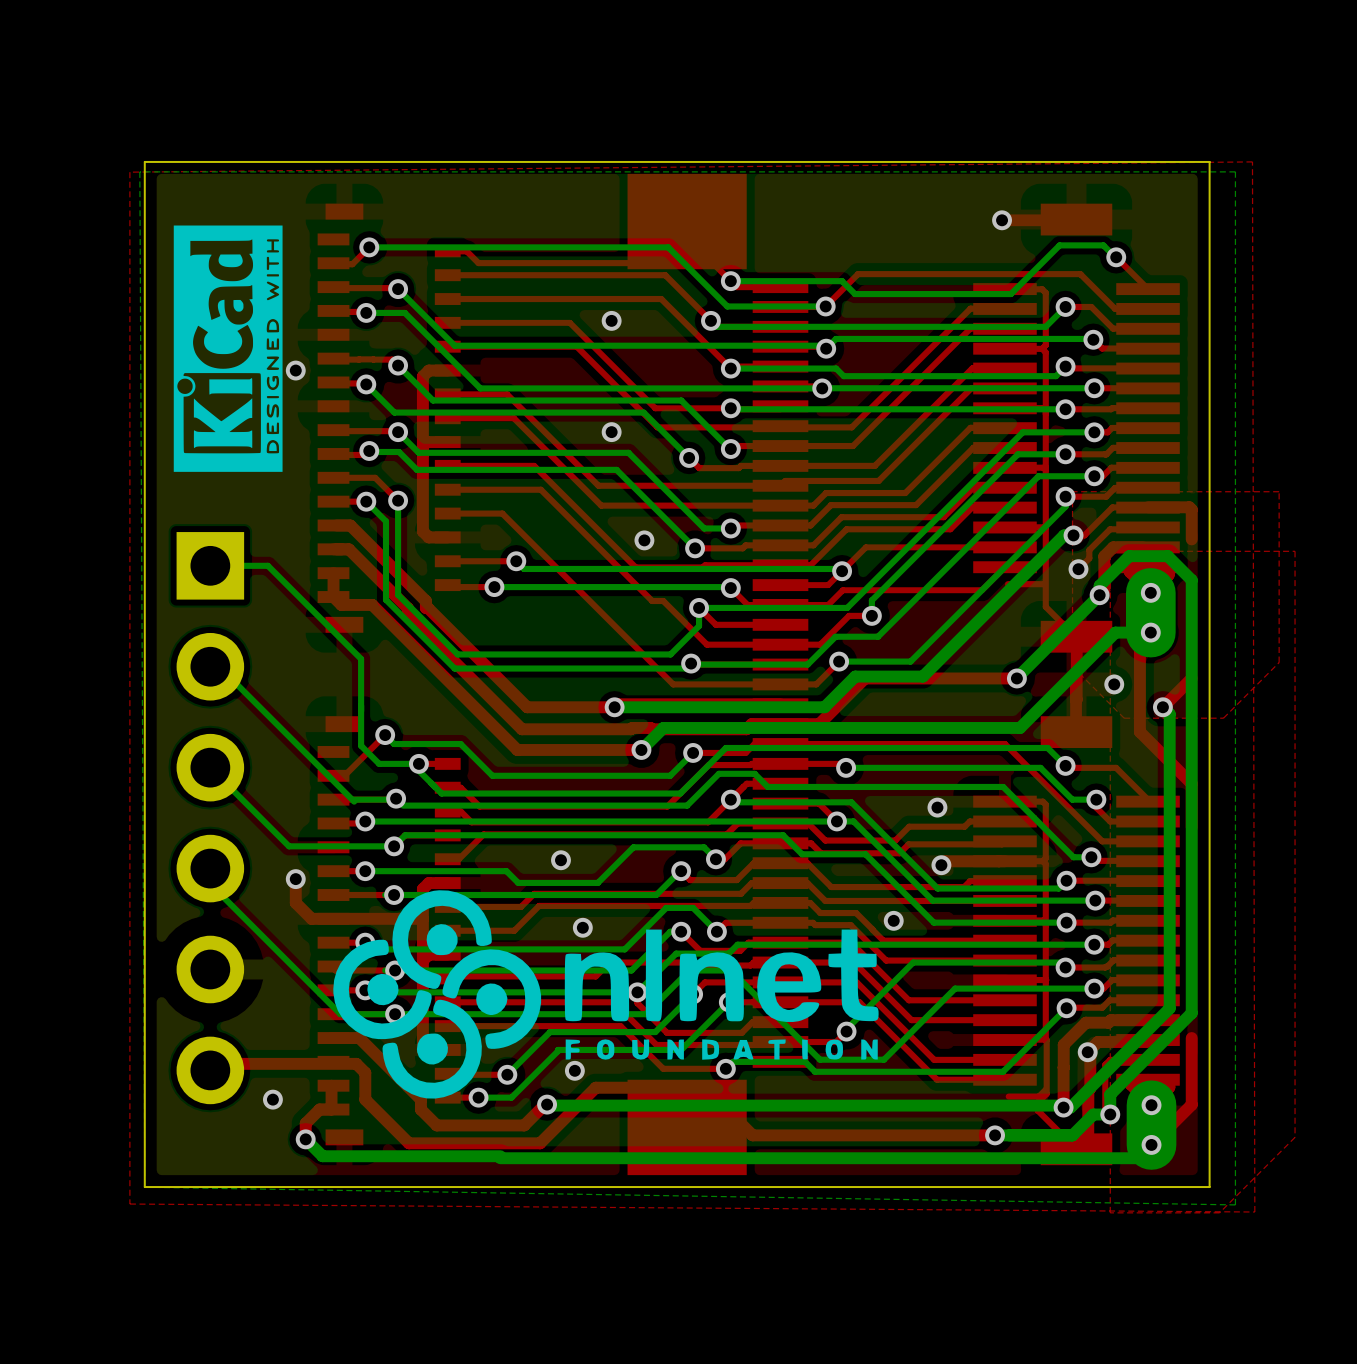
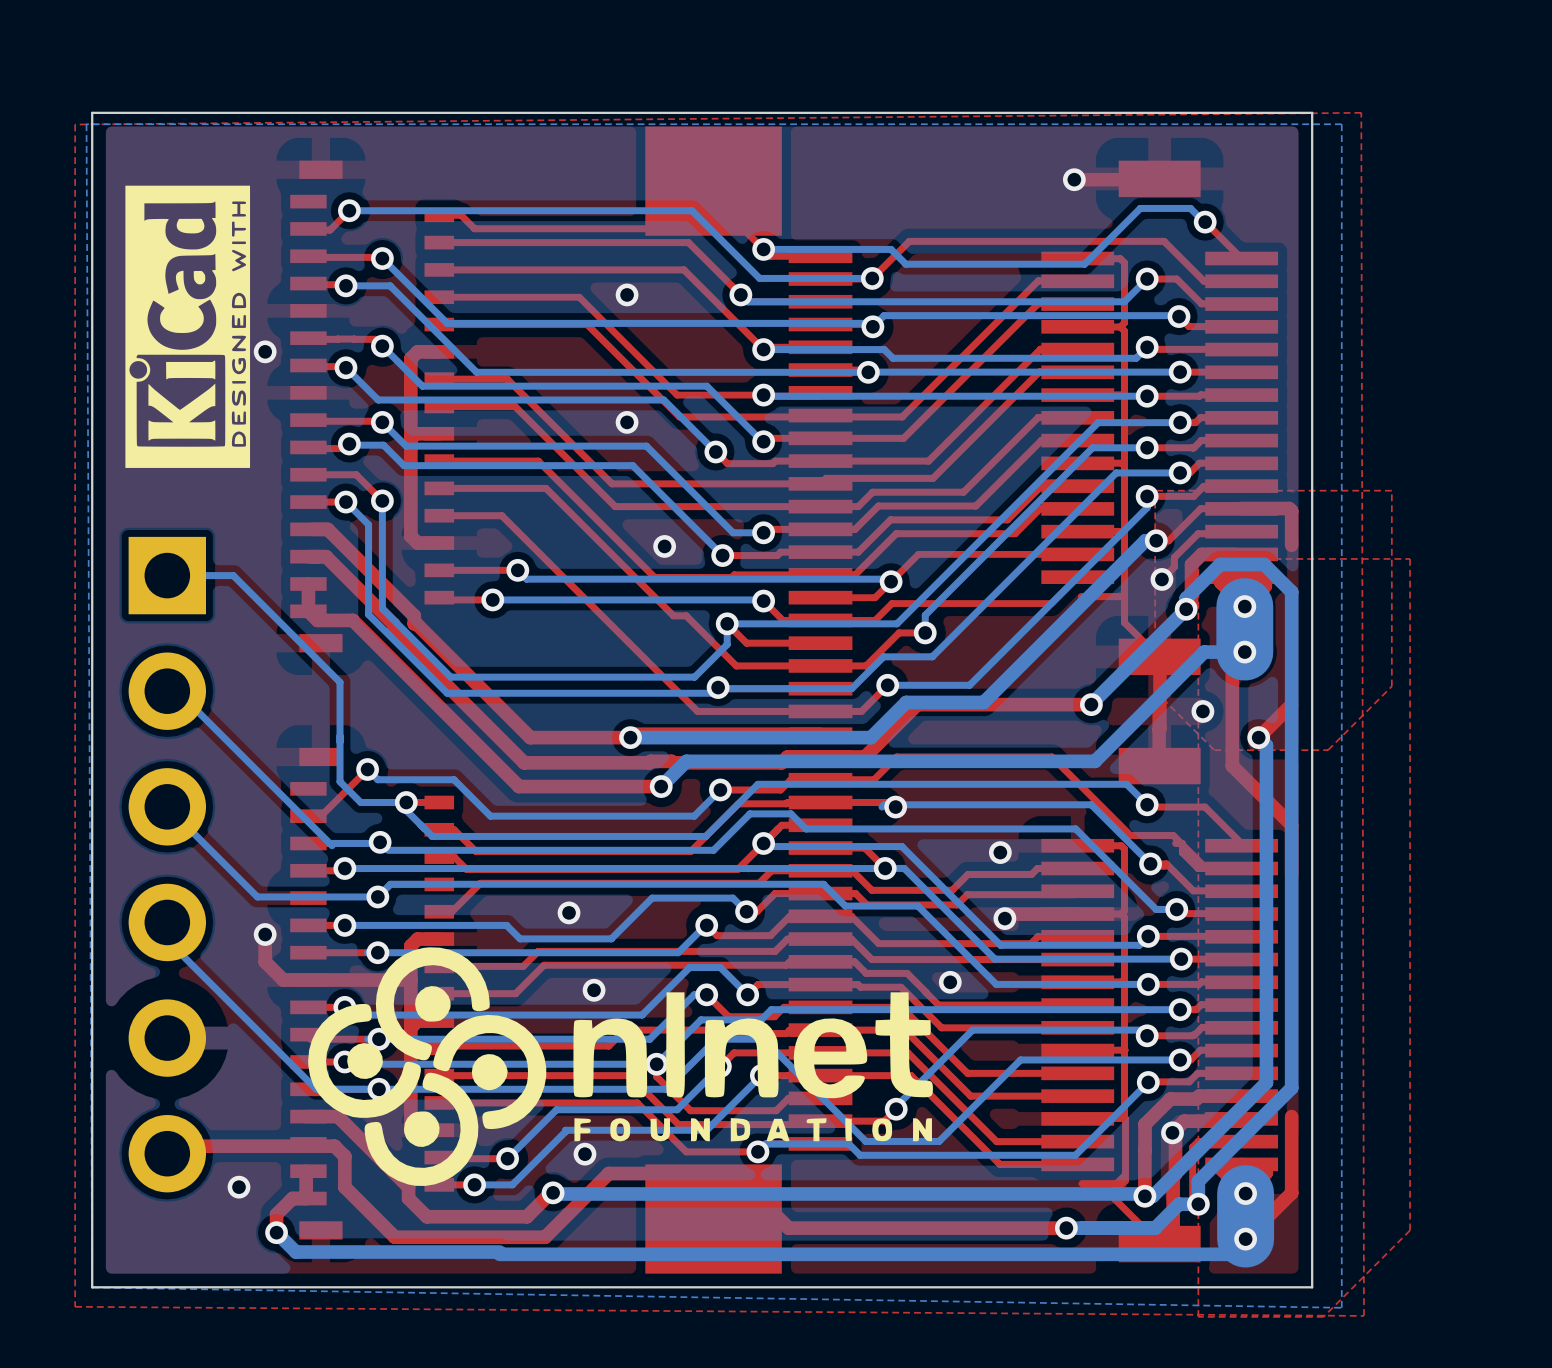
top track: (827, 744) (1004, 744) (1102, 841) (1148, 841) -> (874, 779) (896, 756) (1051, 756) (1130, 835) (1173, 835) (1205, 868) (1243, 868)
bottom track: none -> (881, 807) (884, 804) (1091, 804) (1150, 863)
bottom track: (846, 767) (1040, 767) (1072, 799) (1096, 799) -> none
via position: (1096, 799) -> (1150, 863)
top track: none -> (1165, 866) (1152, 866) (1150, 863) (1166, 863) (1193, 890) (1243, 890)

